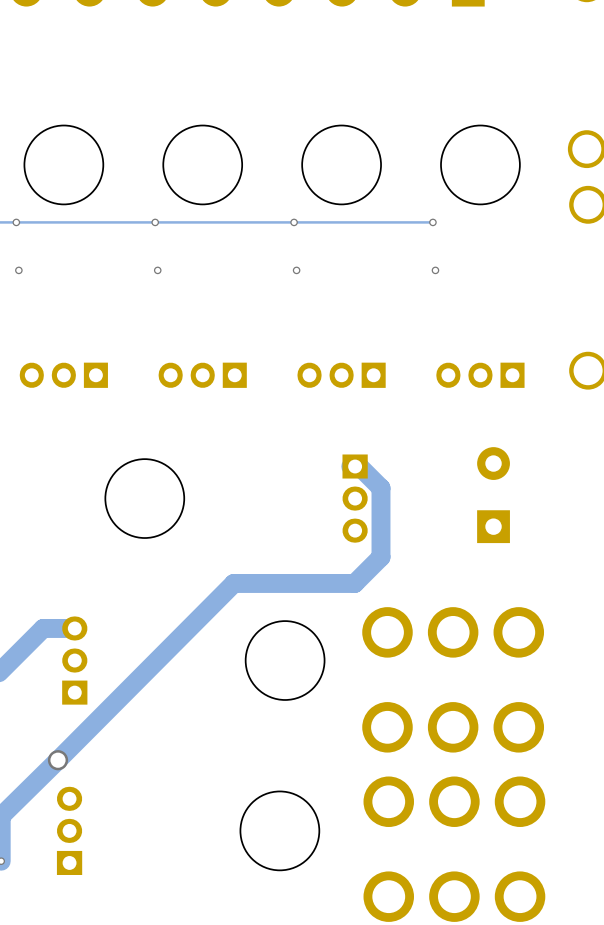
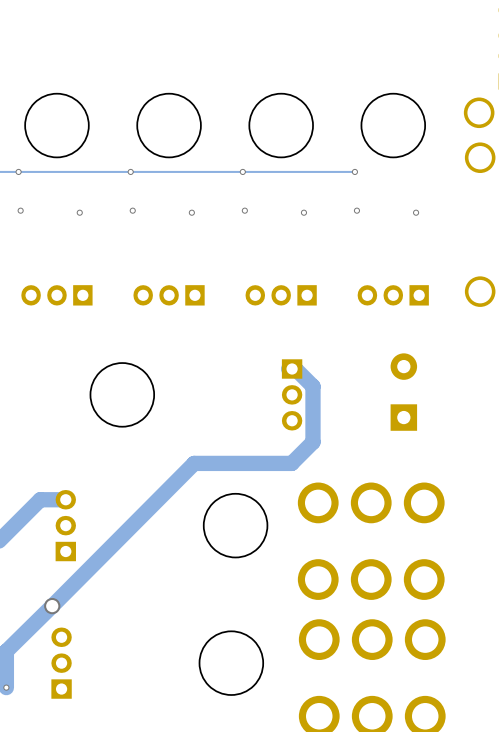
via: none -> (79, 212)
via: none -> (191, 212)
via: none -> (303, 212)
via: none -> (416, 212)

